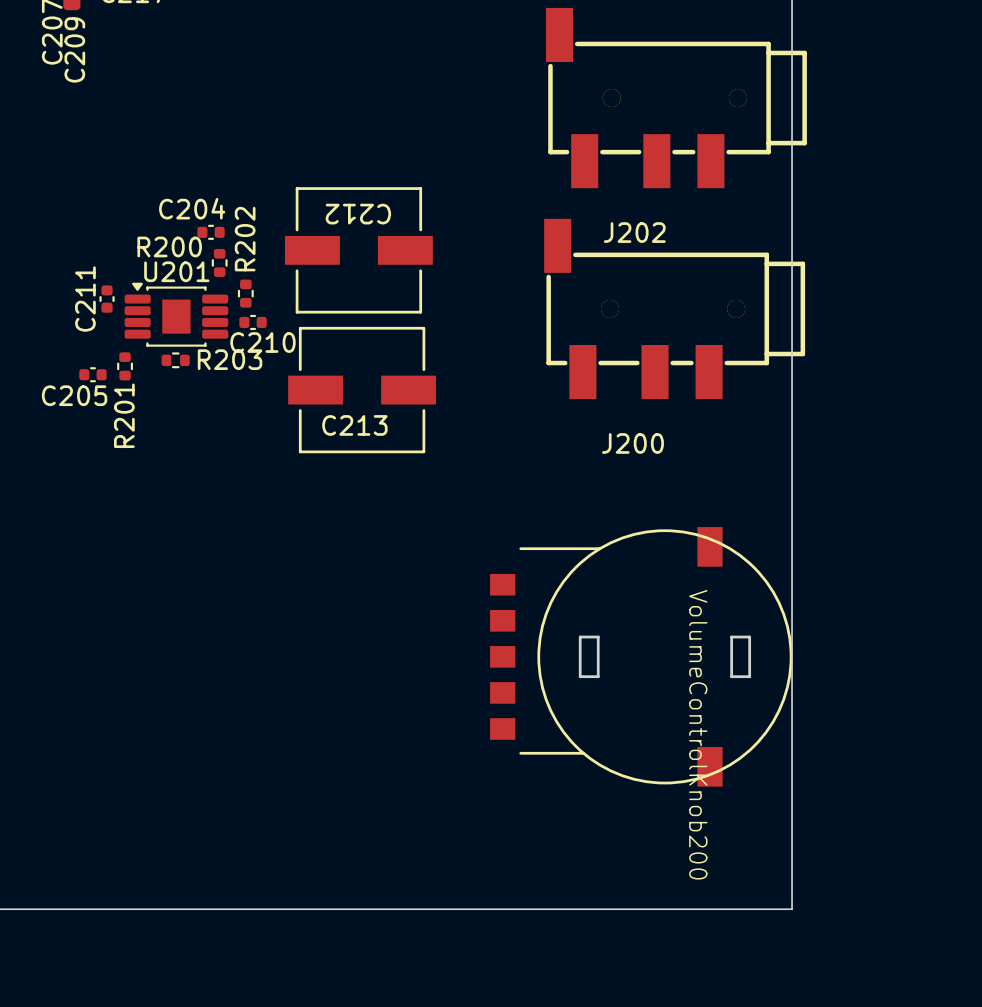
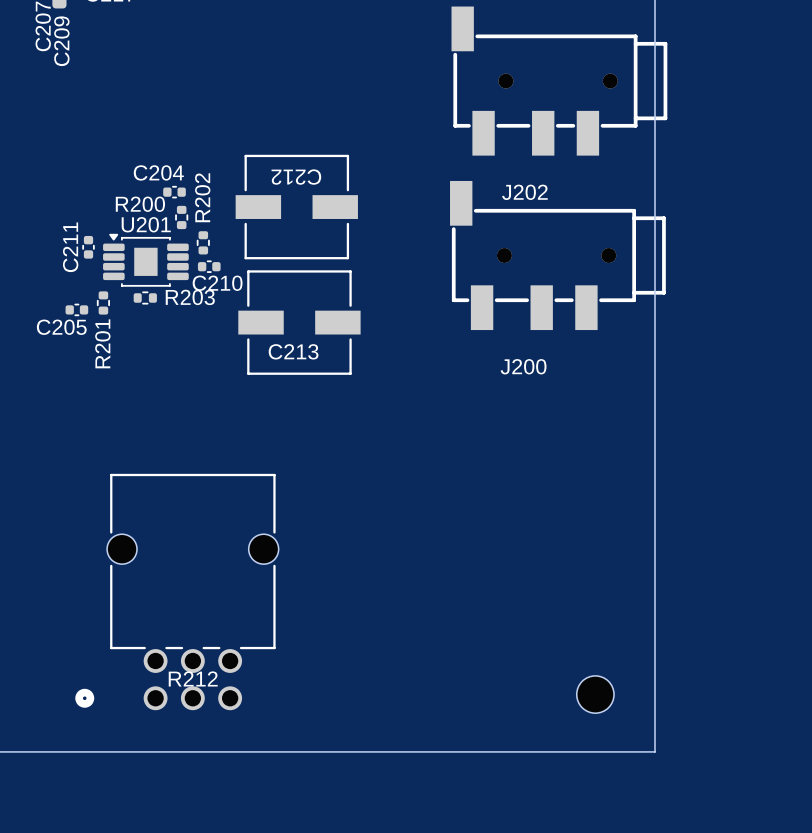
VolumeControlKnob200: (641, 656) -> none
R212: none -> (176, 592)
part: none -> (595, 694)

